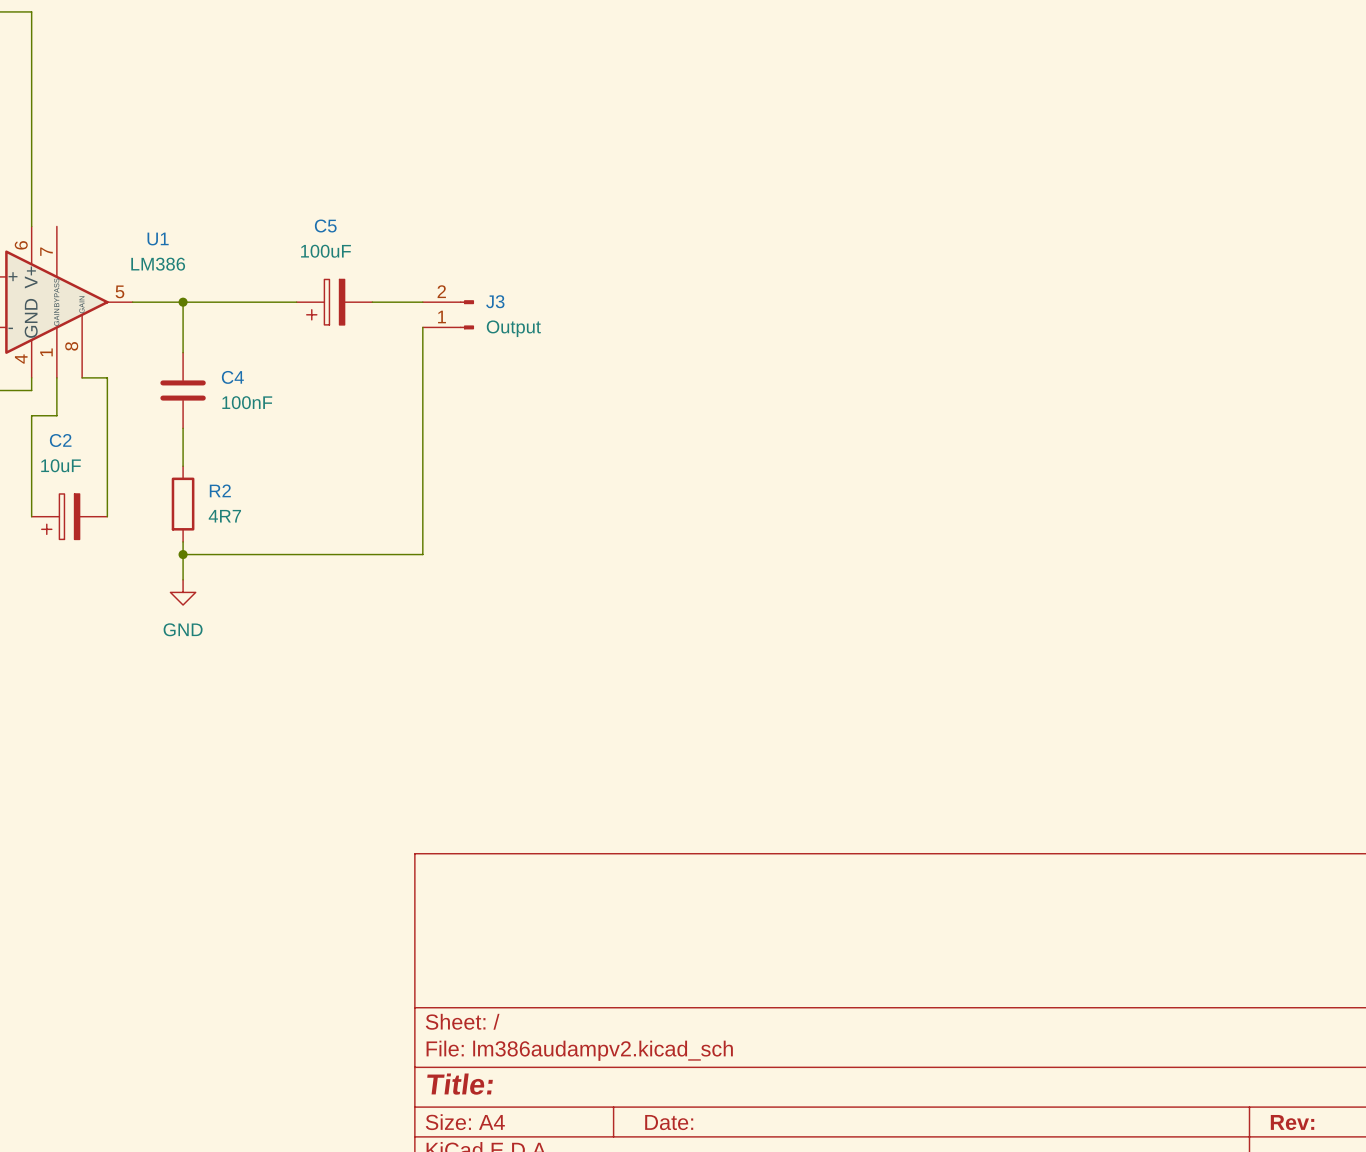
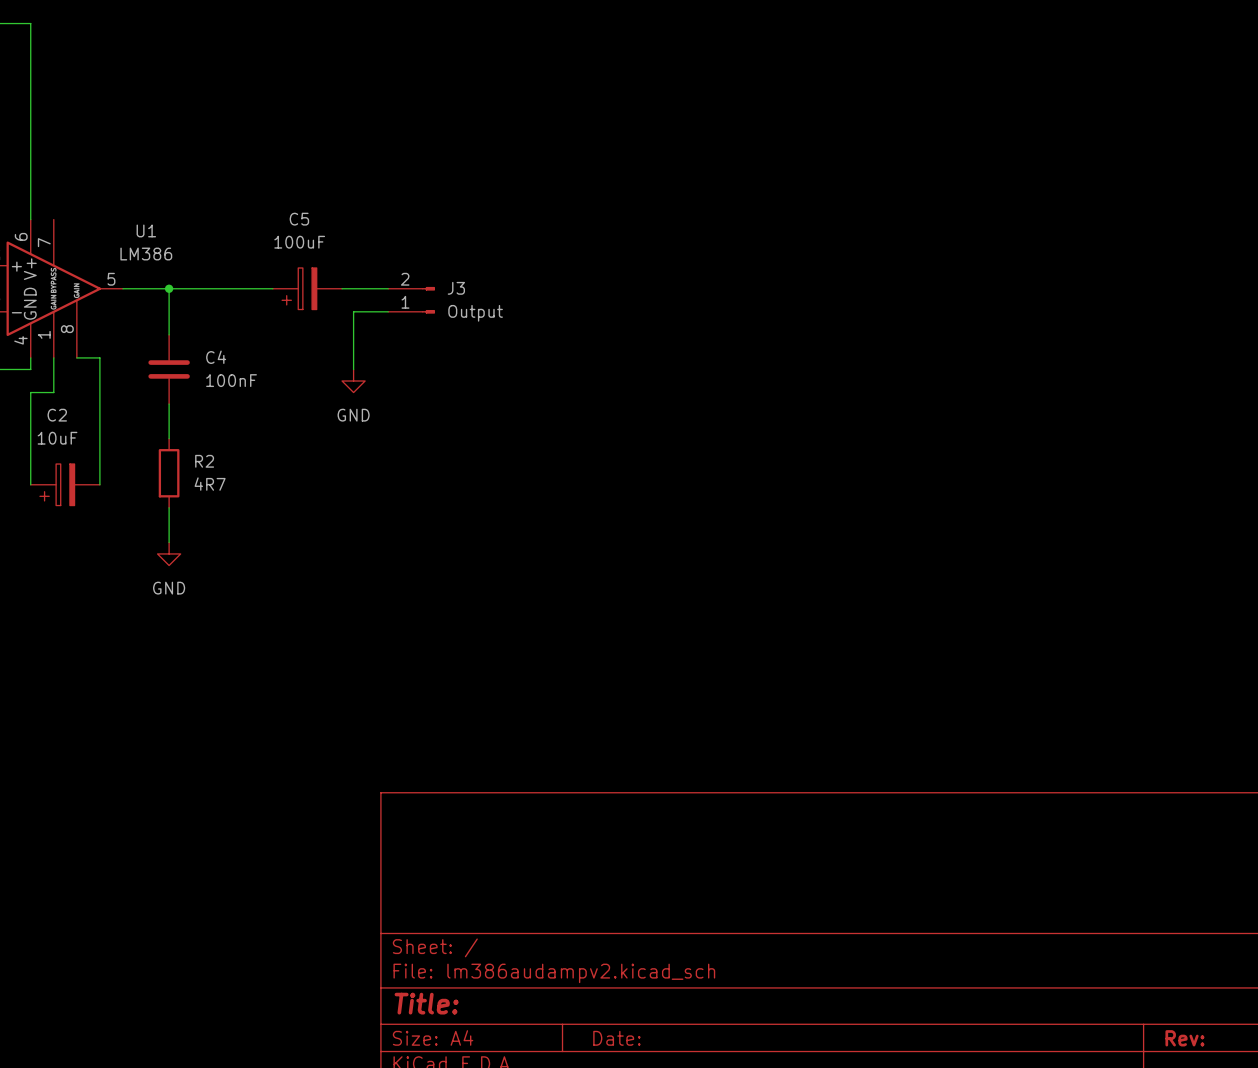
wire: (422, 327) (422, 554) (183, 554) -> (388, 311) (353, 311) (353, 369)
power symbol: none -> GND (353, 381)
junction: (183, 554) -> none

